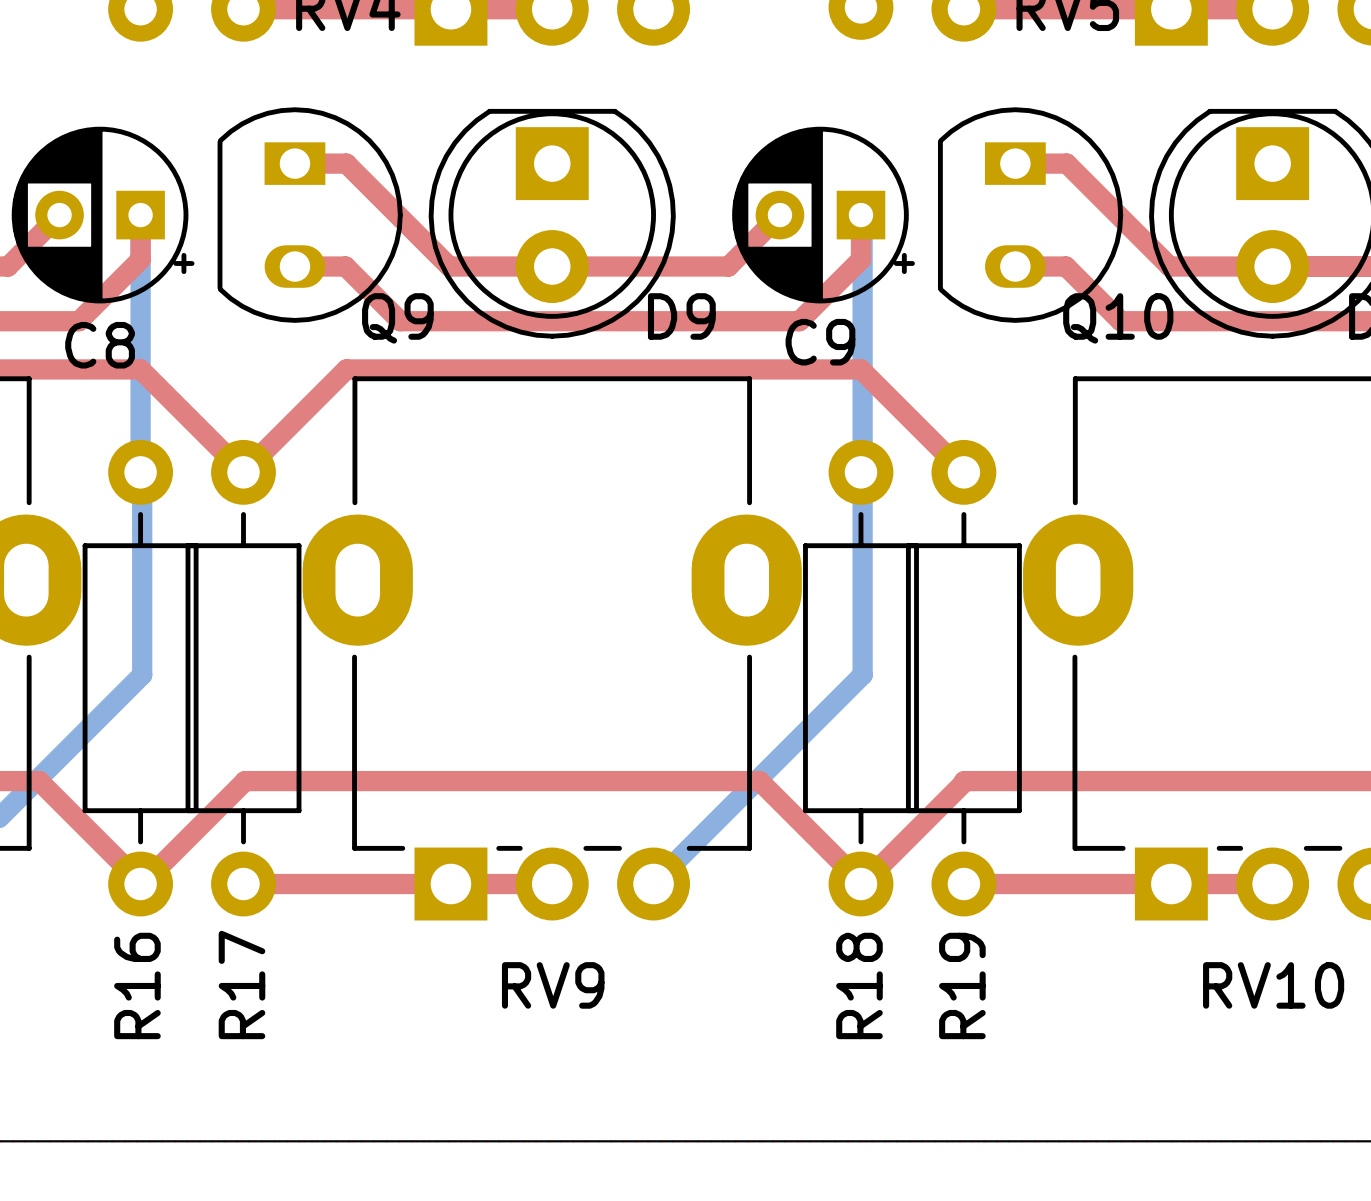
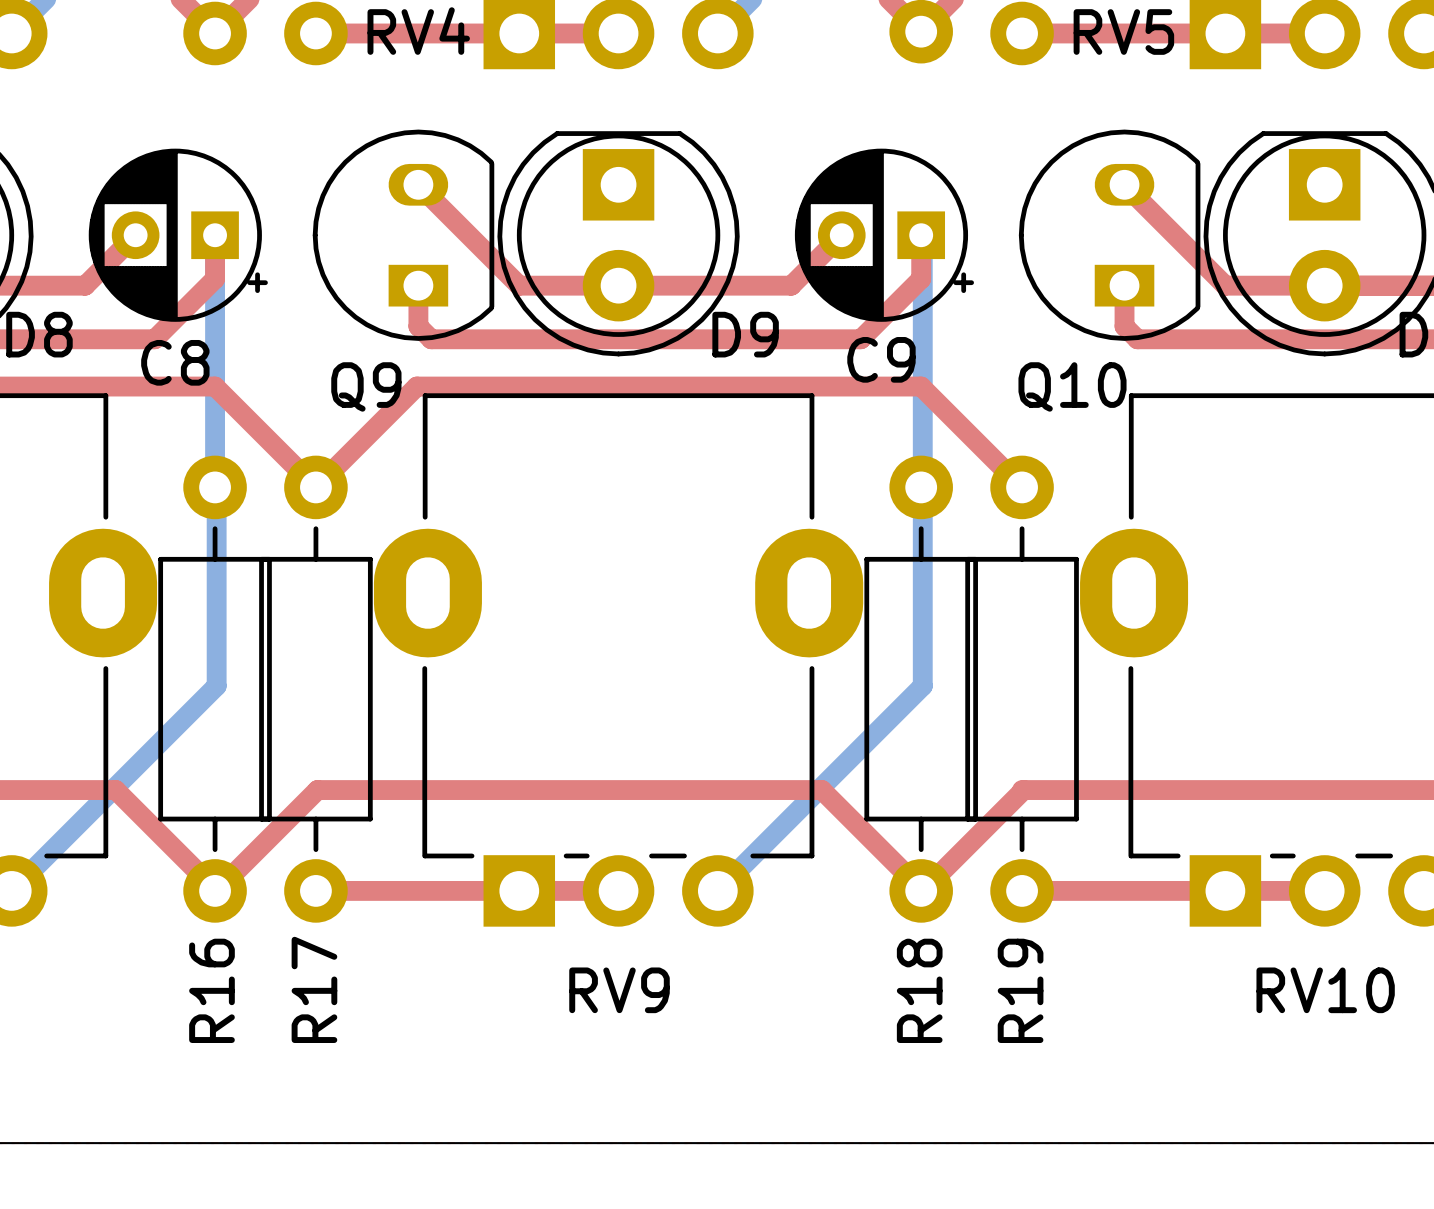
top track: (294, 163) (346, 163) (450, 266) -> (418, 184) (519, 285)
top track: (1015, 163) (1066, 163) (1171, 266) -> (1124, 184) (1225, 285)
Q9 rotation: 0° (310, 215) -> 180° (403, 235)
Q10 rotation: 0° (1030, 215) -> 180° (1109, 235)
top track: (294, 266) (345, 266) (400, 321) -> (418, 285) (418, 326) (431, 339) (469, 339)
top track: (1015, 266) (1066, 266) (1120, 321) -> (1124, 285) (1124, 326) (1137, 339) (1175, 339)
Q9 name position: Q9 (397, 318) -> Q9 (366, 386)
Q10 name position: Q10 (1118, 318) -> Q10 (1072, 386)

